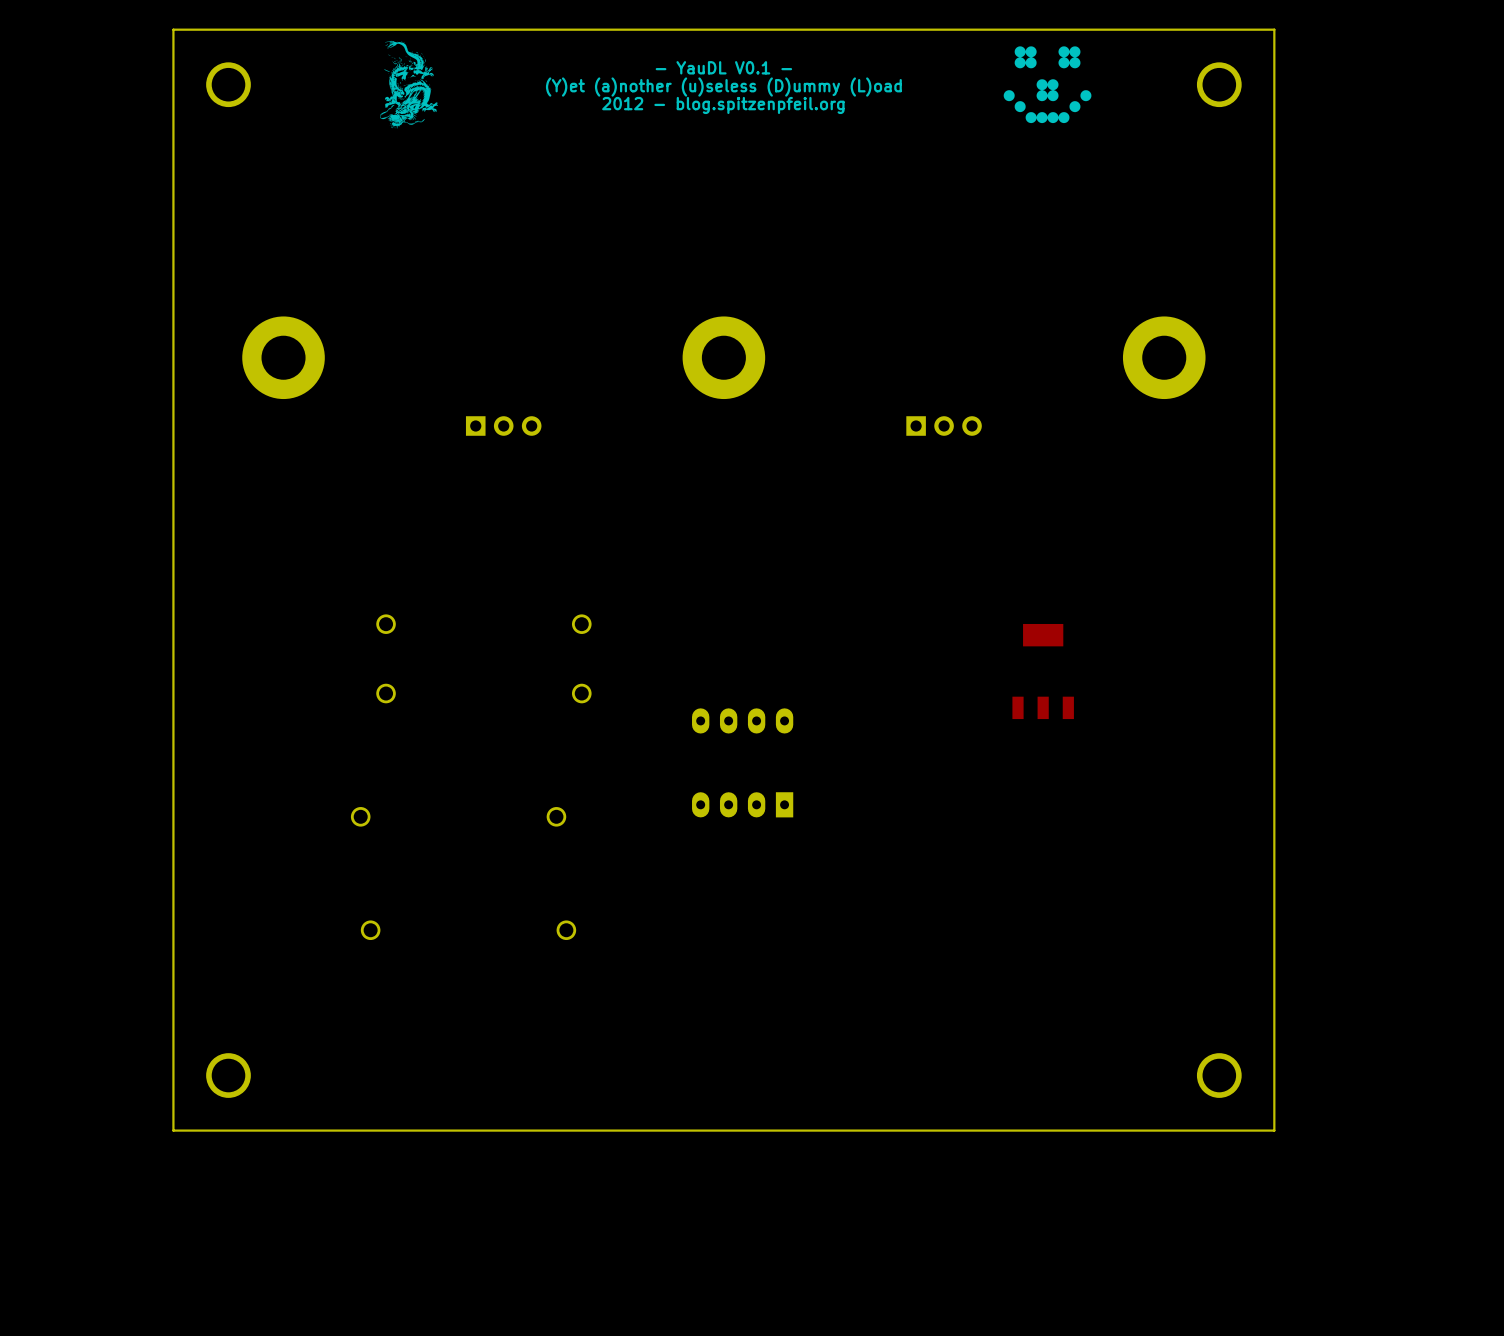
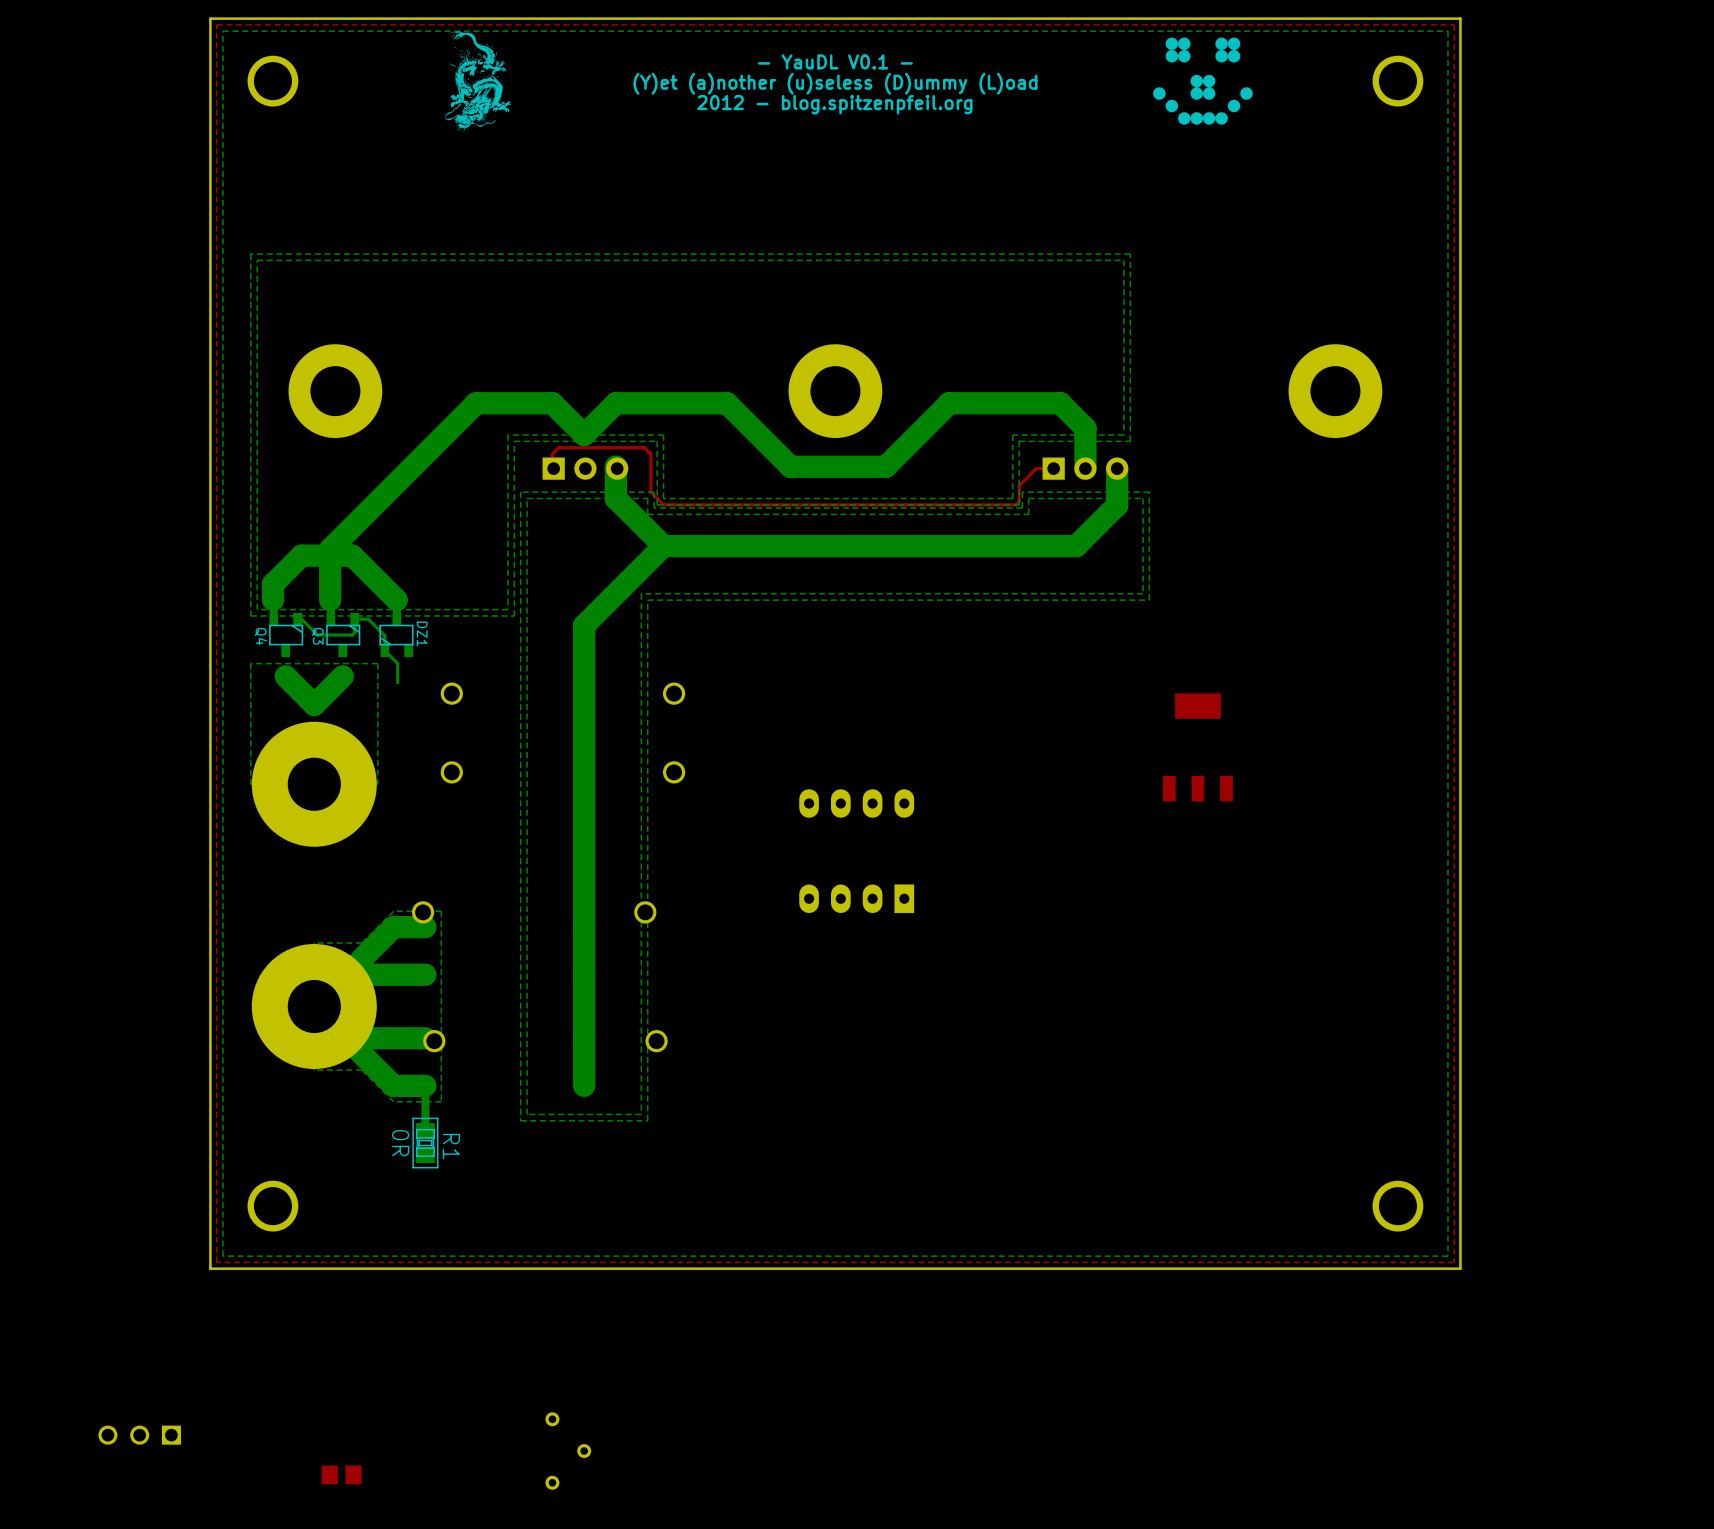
top zone outline: none -> (1454, 24) (216, 24) (216, 1262) (1454, 1262) (1454, 24)
bottom zone outline: none -> (1447, 31) (222, 31) (222, 1256) (1447, 1256) (1447, 31)
bottom zone outline: none -> (1130, 254) (1130, 441) (1019, 441) (1019, 504) (657, 504) (657, 441) (514, 441) (514, 615) (250, 615) (250, 254) (1130, 254)
bottom zone outline: none -> (1123, 260) (257, 260) (257, 609) (507, 609) (507, 435) (663, 435) (663, 498) (1012, 498) (1012, 435) (1123, 435) (1123, 260)
bottom track: none -> (617, 468) (615, 466) (615, 498) (663, 546)
top track: none -> (1053, 468) (1036, 468) (1019, 485) (1019, 501) (1016, 504) (663, 504) (650, 492) (650, 454) (644, 447) (558, 447) (552, 454) (552, 469) (553, 468)
bottom track: none -> (1085, 468) (1085, 428) (1060, 403) (949, 403) (885, 466) (790, 466) (727, 403) (615, 403) (584, 435) (552, 403) (476, 403) (330, 549) (330, 619)
bottom track: none -> (1117, 468) (1117, 505) (1076, 546) (663, 546)
bottom zone outline: none -> (1149, 492) (1149, 600) (647, 600) (647, 1120) (520, 1120) (520, 492) (654, 492) (654, 508) (1022, 508) (1022, 492) (1149, 492)
bottom zone outline: none -> (1143, 498) (1028, 498) (1028, 514) (647, 514) (647, 498) (527, 498) (527, 1114) (641, 1114) (641, 593) (1143, 593) (1143, 498)
bottom track: none -> (663, 546) (584, 625) (584, 1085)
bottom track: none -> (297, 619) (301, 619) (317, 635) (352, 635) (354, 632) (354, 619) (368, 619) (384, 635) (384, 650) (397, 663) (397, 682)
bottom track: none -> (396, 619) (396, 600) (352, 555) (301, 555) (273, 584) (273, 619)
Q4: none -> (286, 635)
Q3: none -> (343, 635)
DZ1: none -> (396, 635)
bottom zone outline: none -> (377, 663) (250, 663) (250, 784) (377, 784) (377, 663)
bottom track: none -> (342, 676) (314, 704) (285, 676)
part: none -> (314, 784)
bottom zone outline: none -> (441, 911) (393, 911) (361, 943) (314, 943) (314, 1070) (361, 1070) (393, 1101) (441, 1101) (441, 911)
bottom track: none -> (425, 927) (393, 927) (314, 1006) (393, 1085) (425, 1085) (425, 1131)
bottom track: none -> (425, 974) (346, 974)
part: none -> (314, 1006)
bottom track: none -> (425, 1038) (346, 1038)
R1: none -> 0R (425, 1143)
part: none -> (139, 1435)
part: none -> (568, 1451)
part: none -> (341, 1474)

